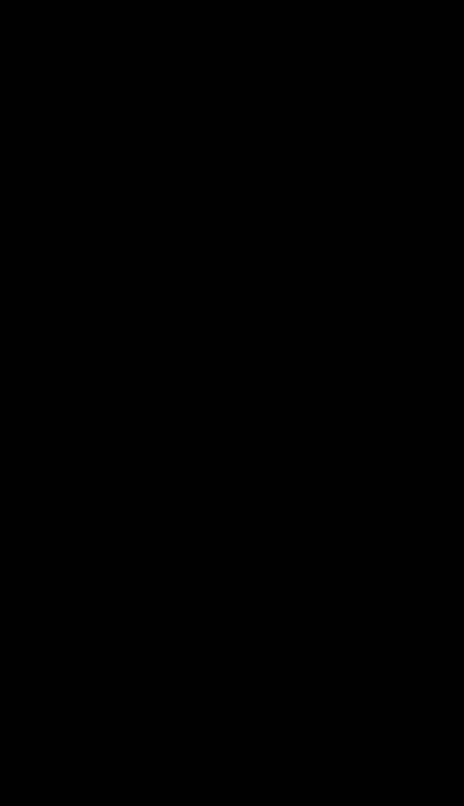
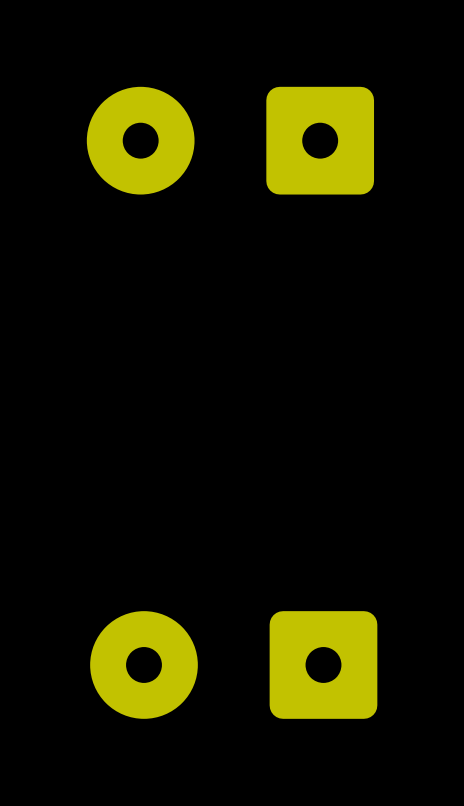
part: none -> (230, 140)
part: none -> (233, 664)

